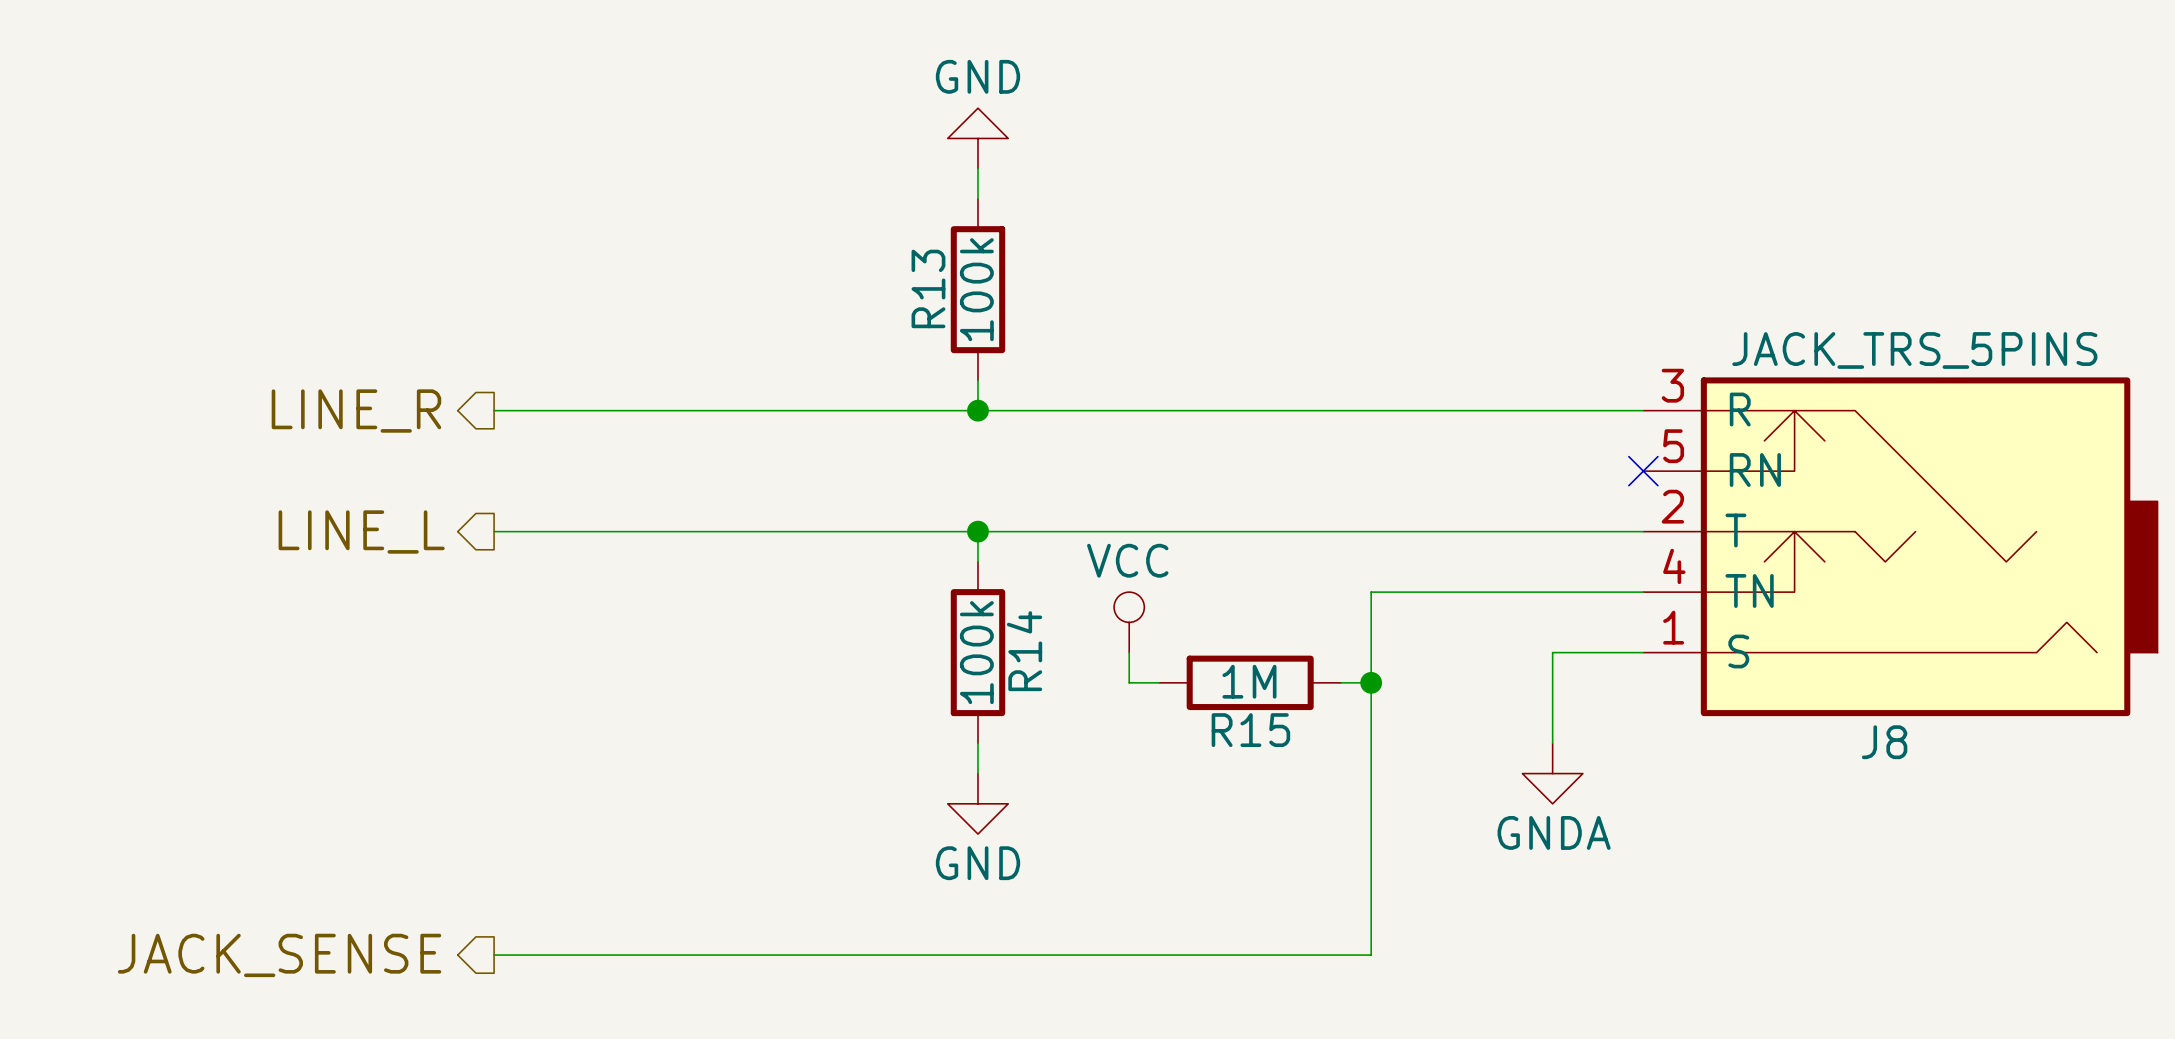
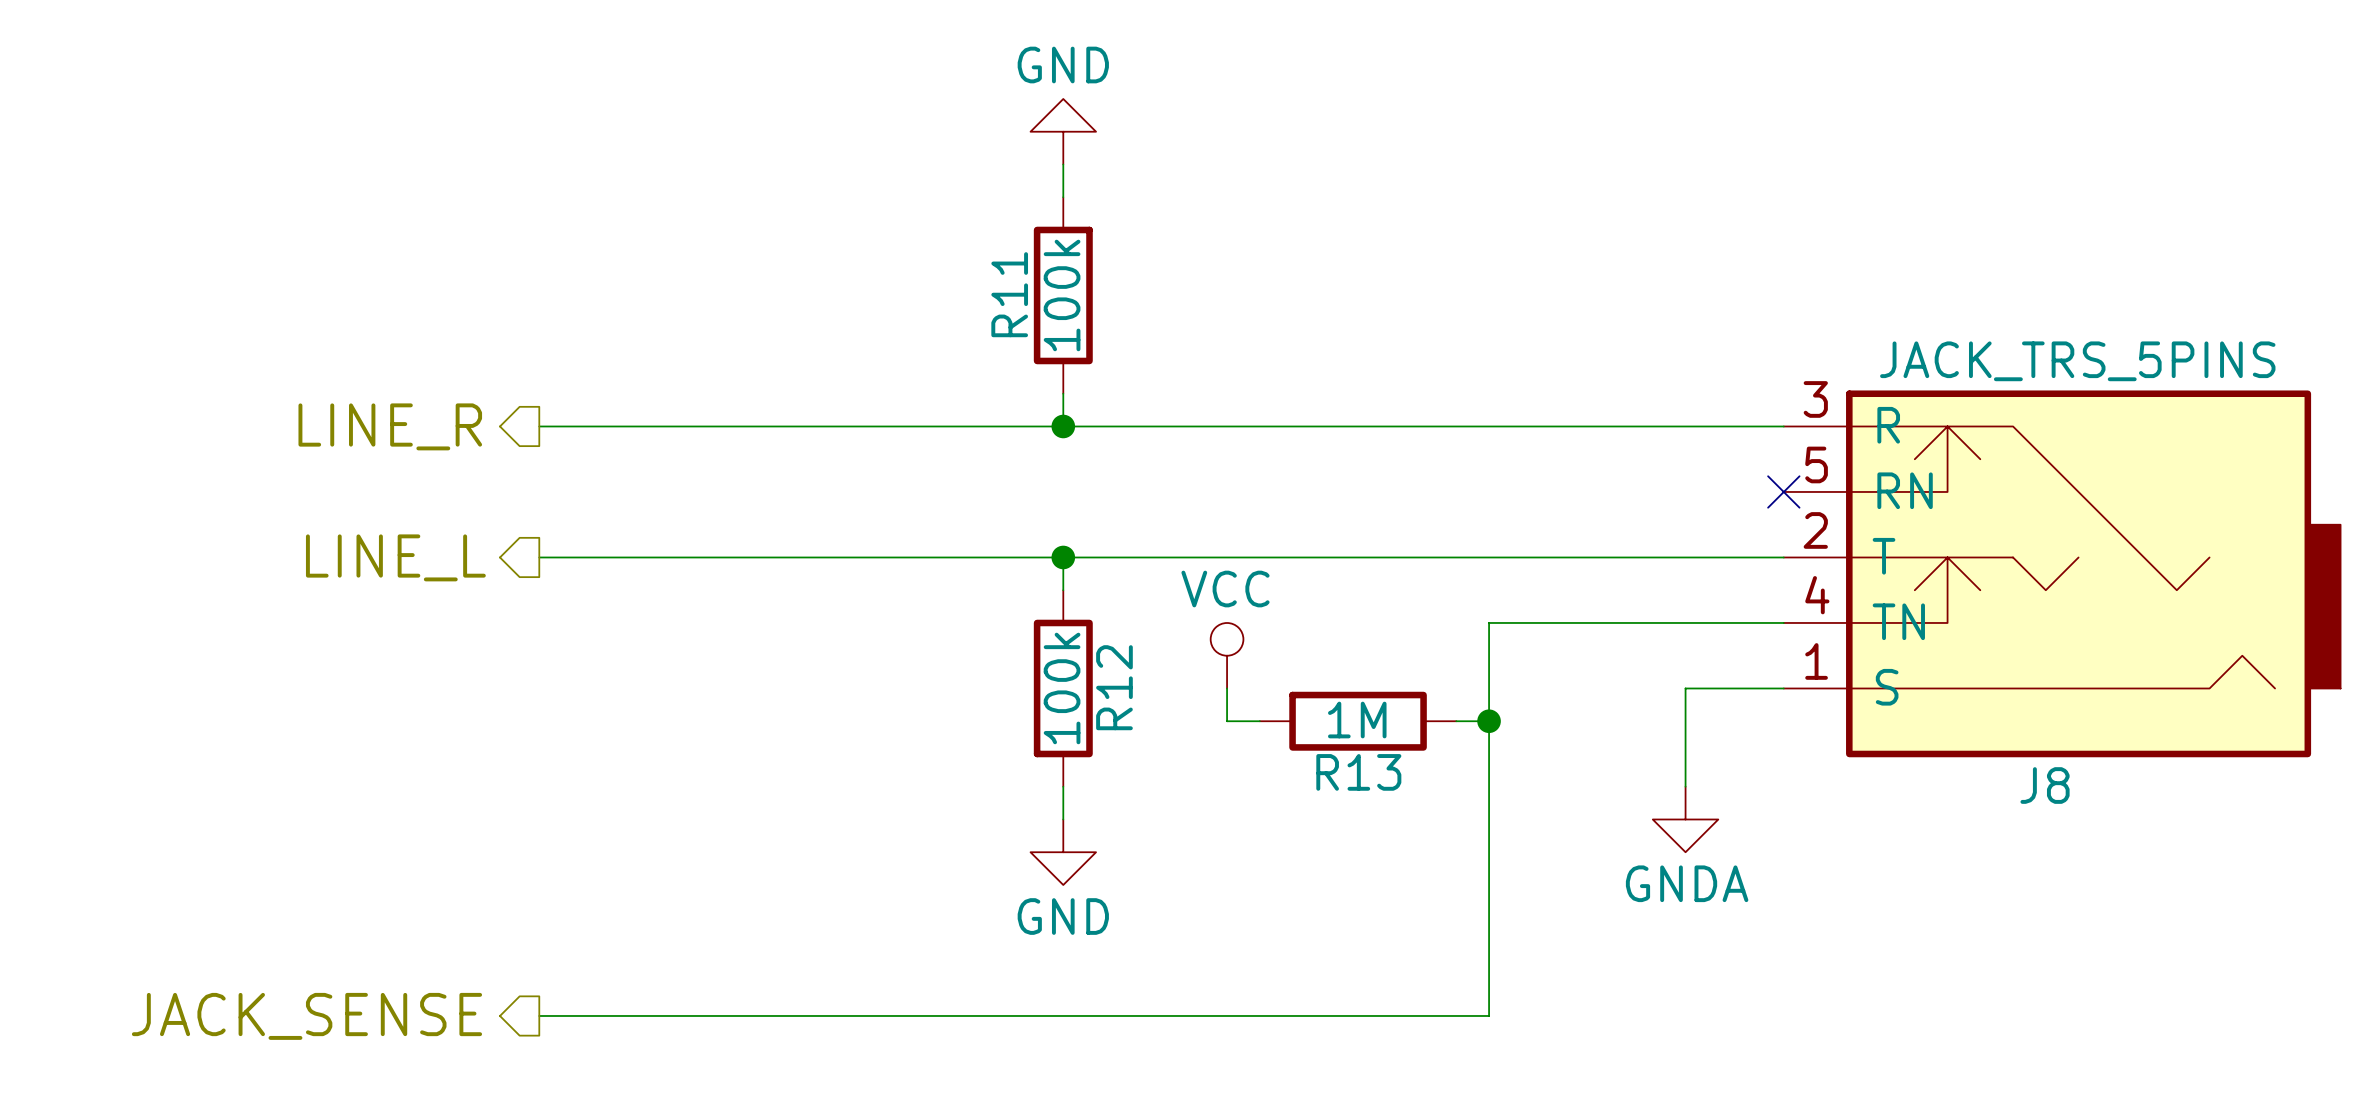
R13 name: R13 (928, 288) -> R11 (1009, 294)
R14 name: R14 (1024, 651) -> R12 (1114, 687)
R15 name: R15 (1250, 730) -> R13 (1358, 772)

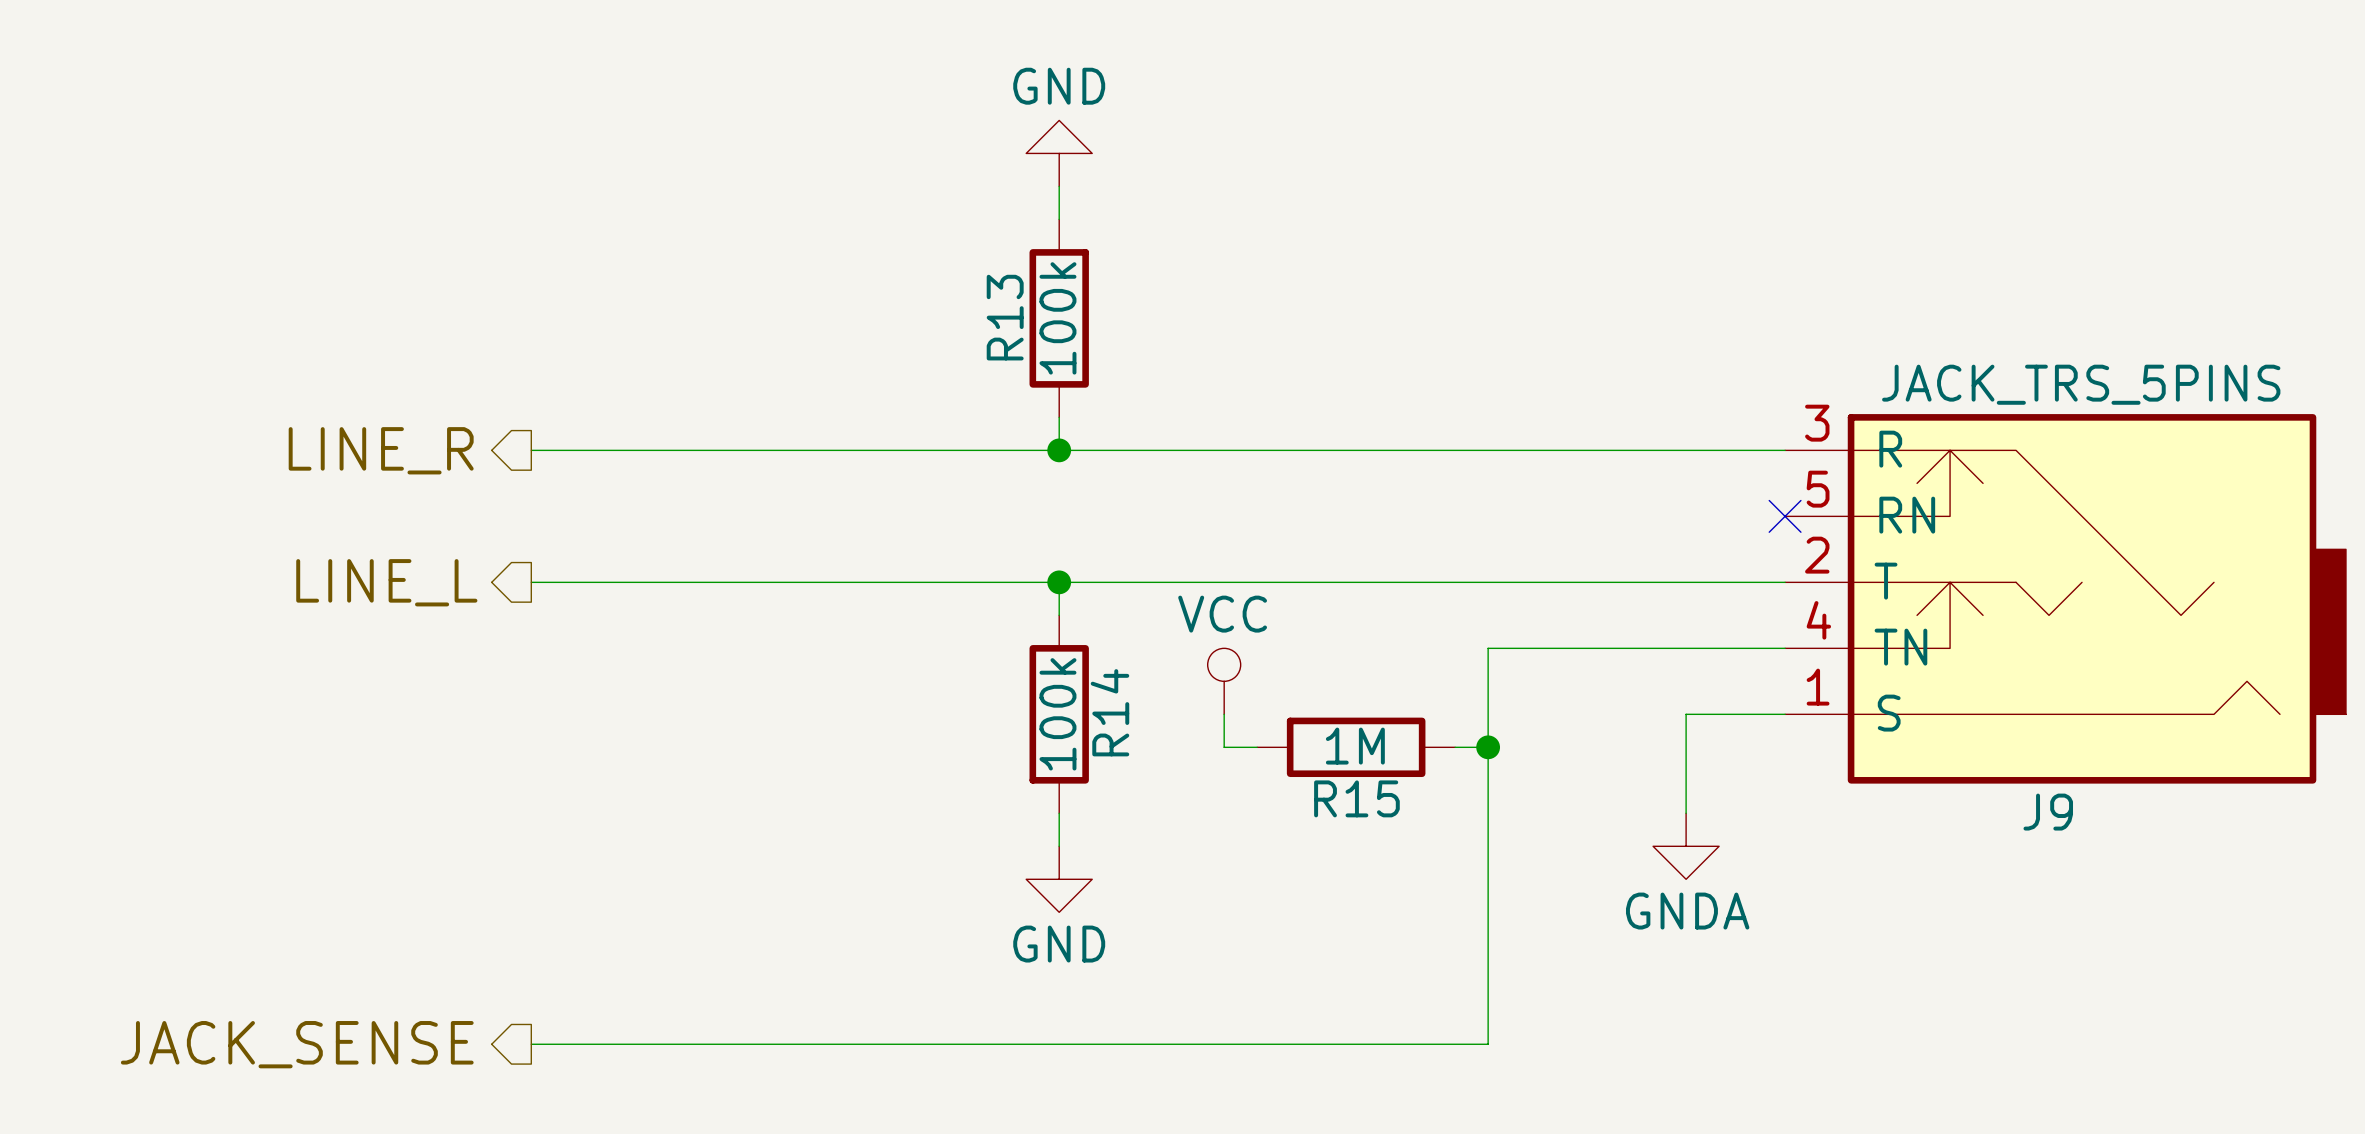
R11 name: R11 (1009, 294) -> R13 (1005, 317)
R12 name: R12 (1114, 687) -> R14 (1109, 712)
R13 name: R13 (1358, 772) -> R15 (1356, 798)
J8 name: J8 (2045, 785) -> J9 (2048, 812)

